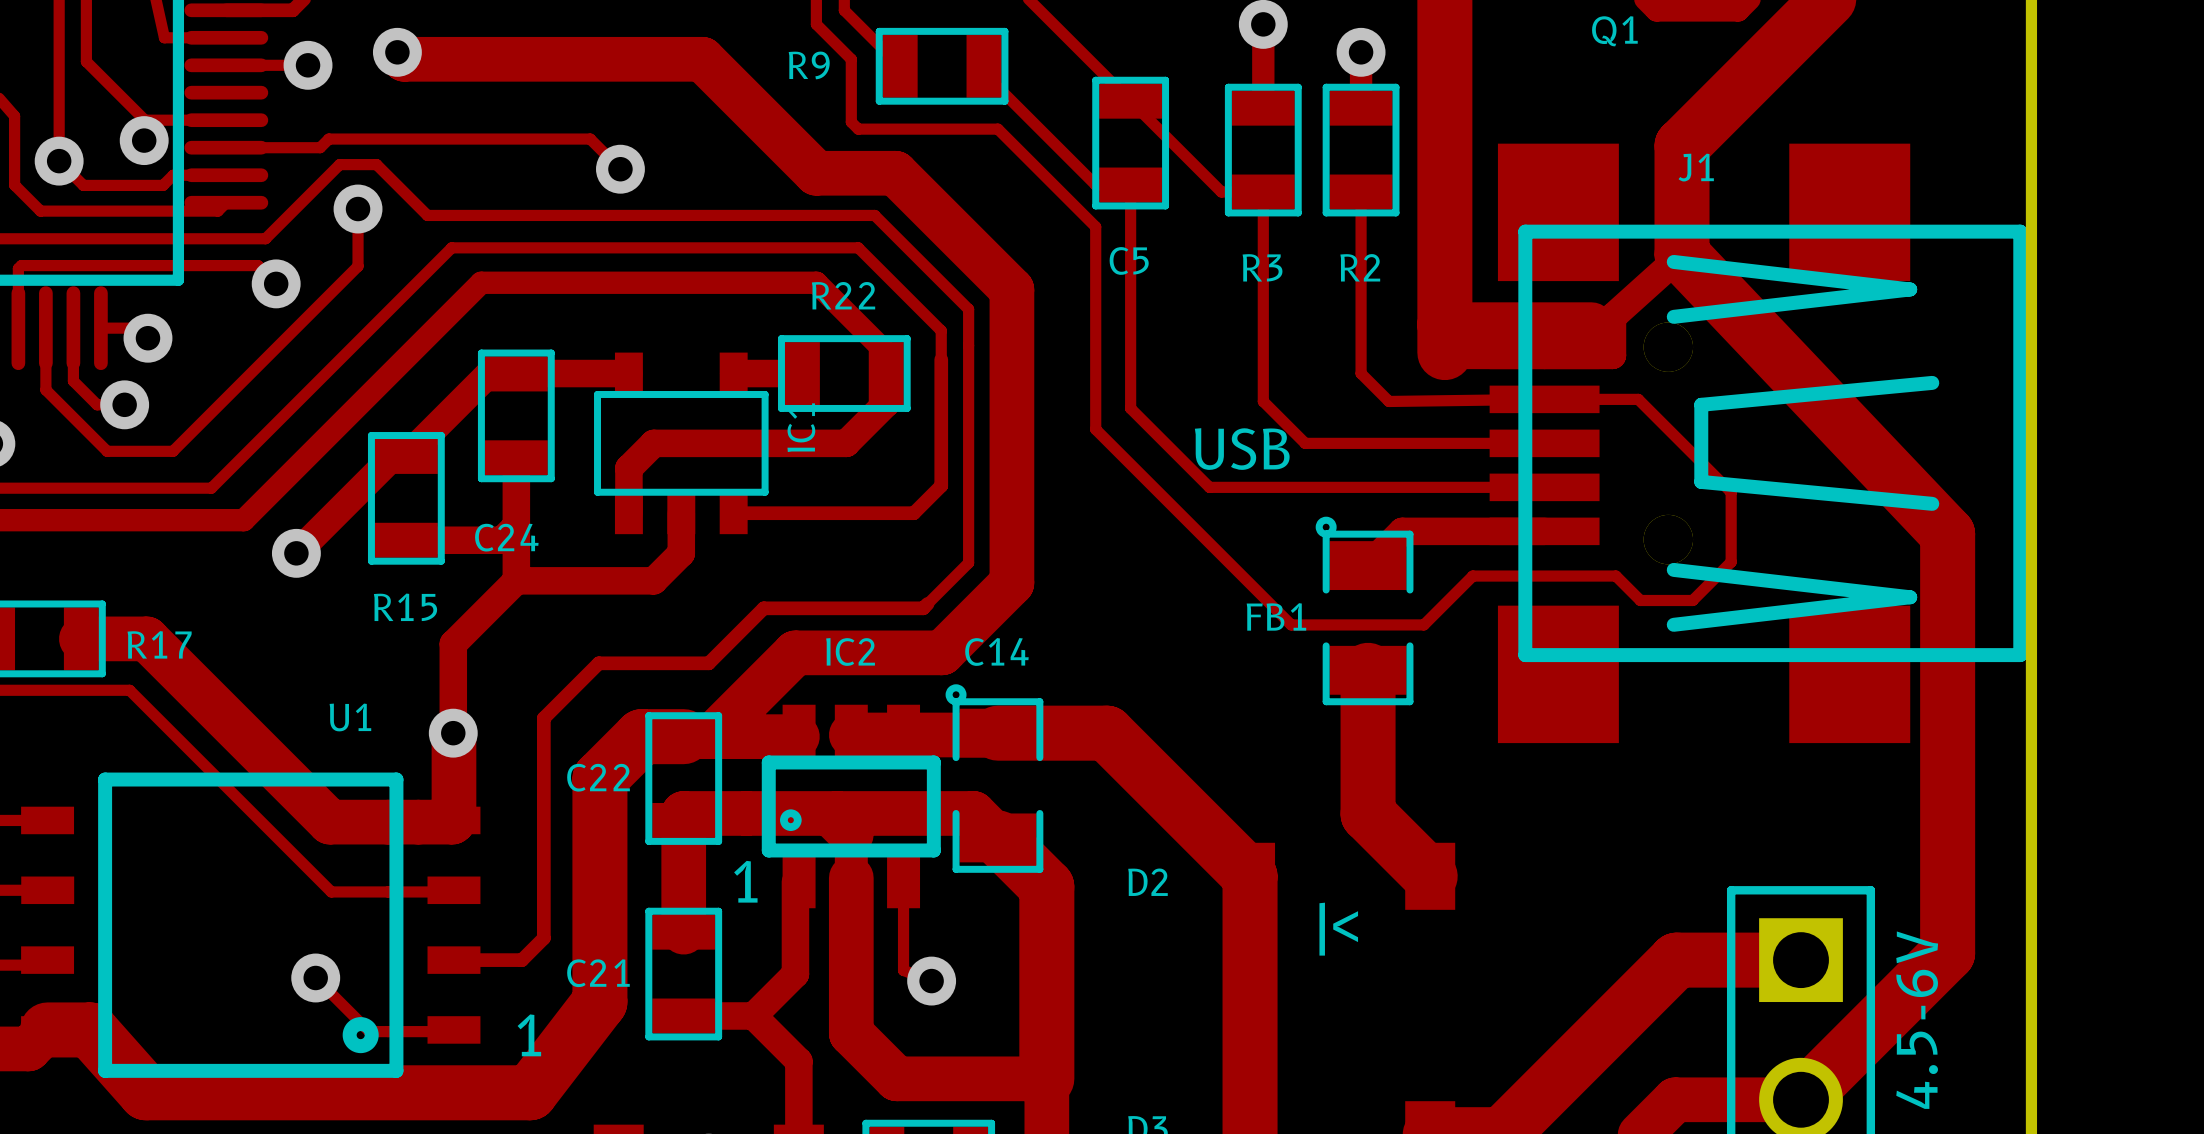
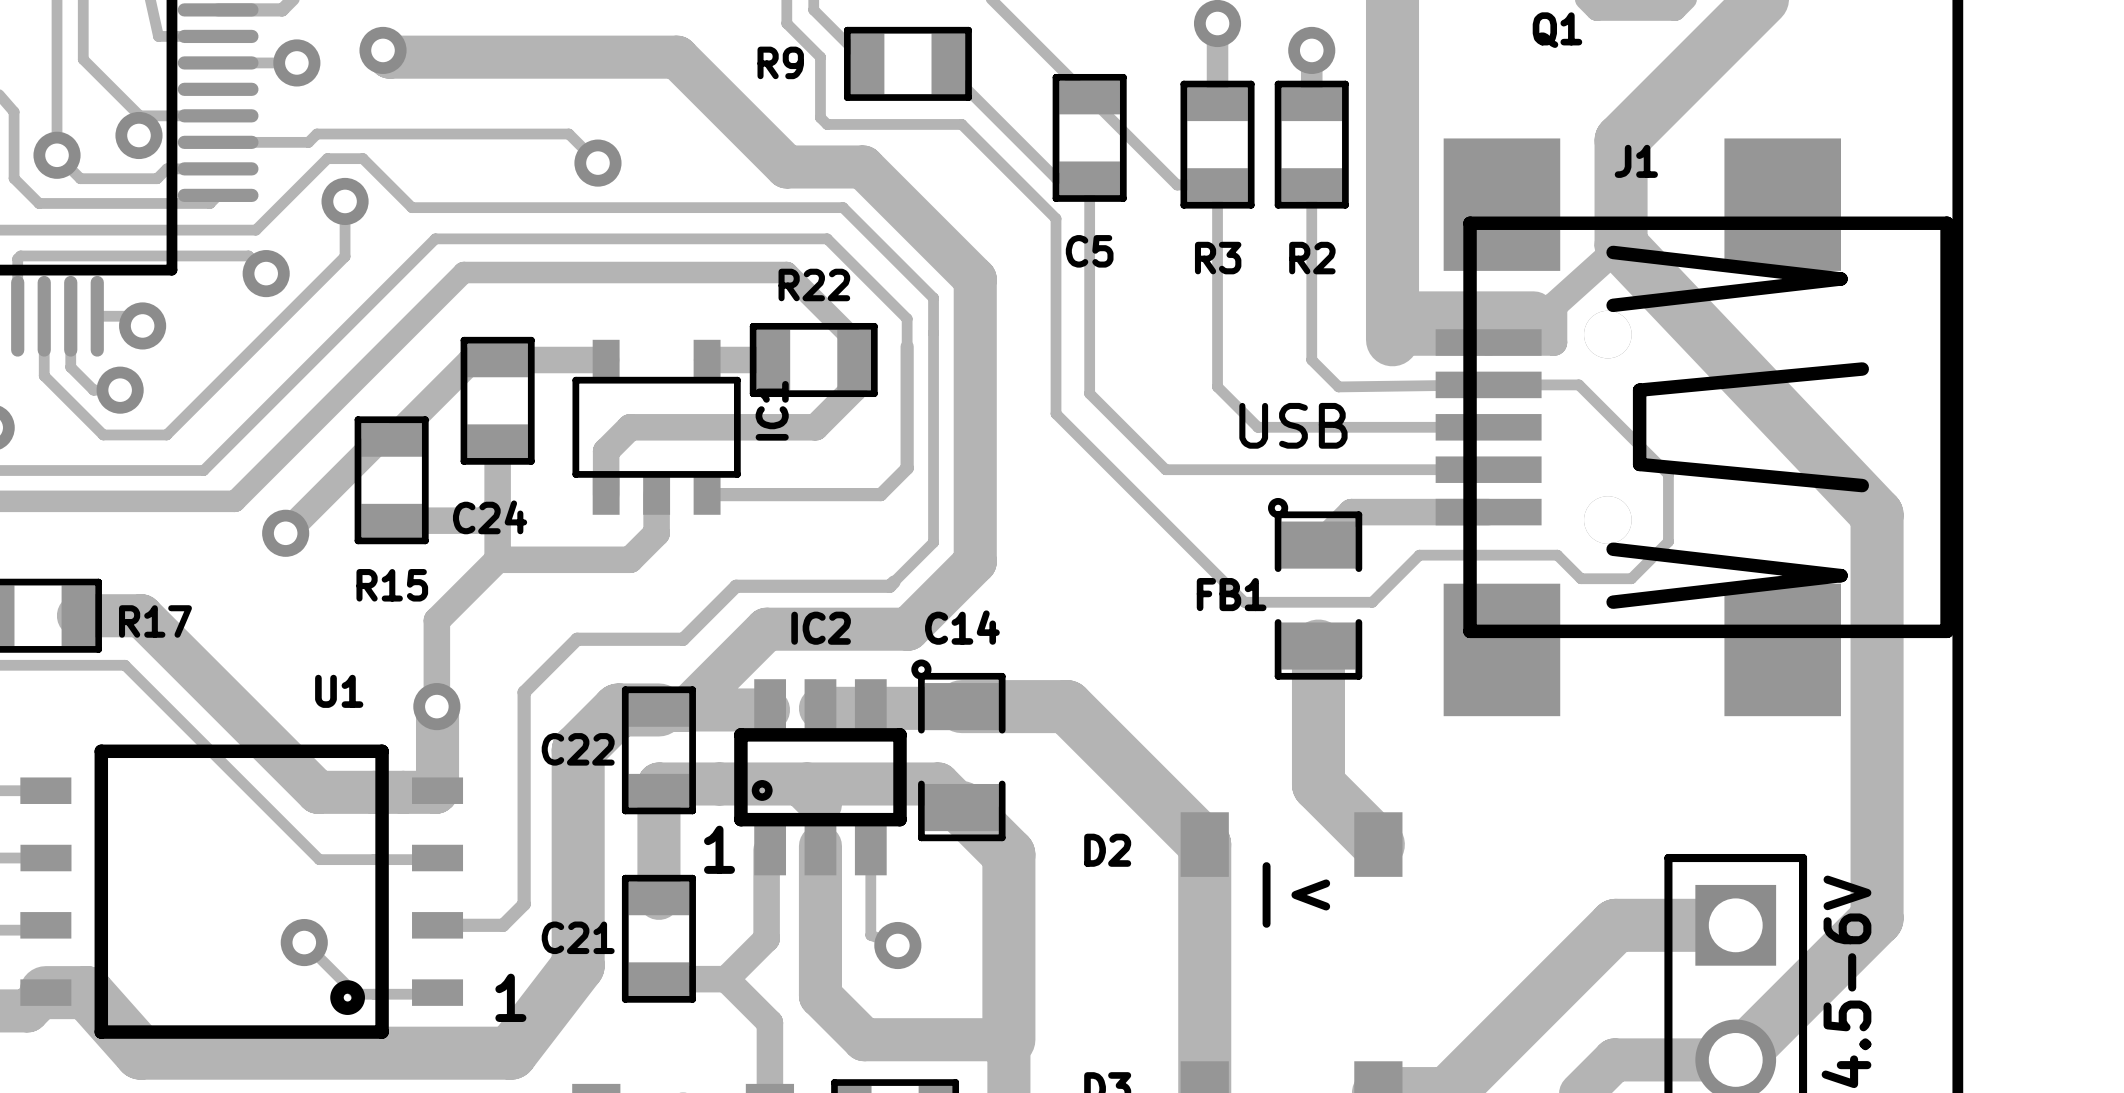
J1 value position: USB (1242, 449) -> USB (1293, 425)

